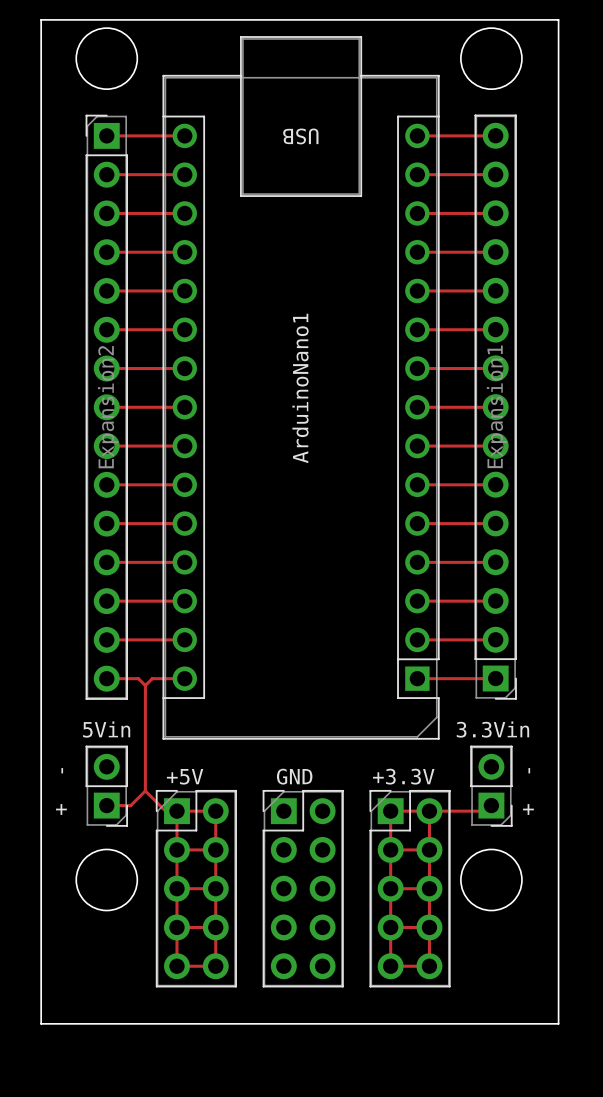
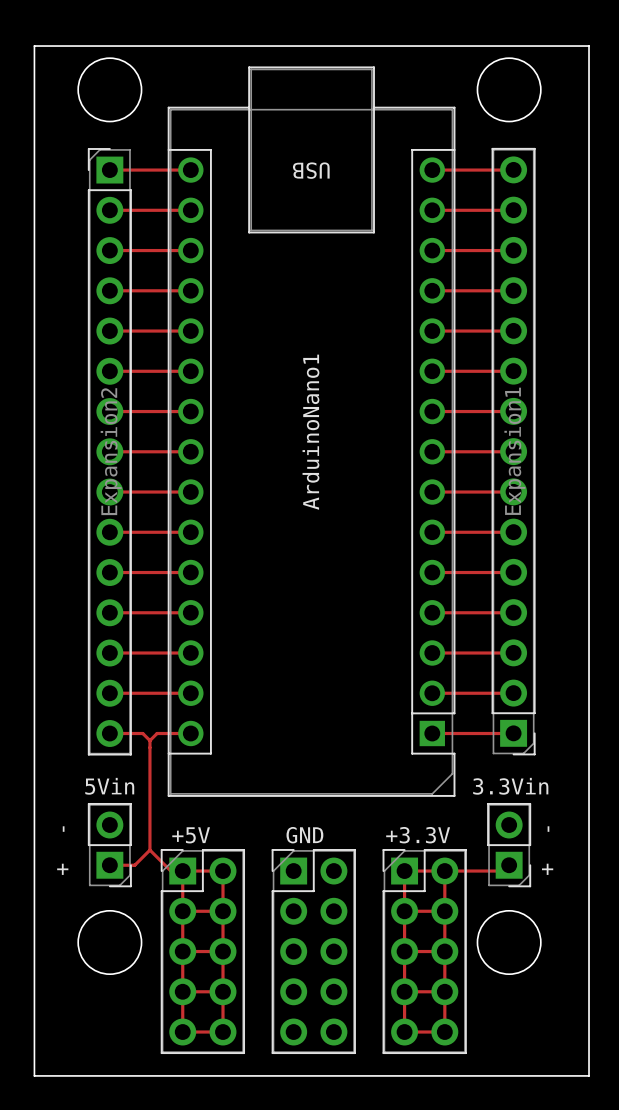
board edge: (41, 19) (558, 19) (558, 1023) (41, 1023) (41, 19) -> (34, 46) (34, 1075) (589, 1075) (589, 46) (34, 46)

